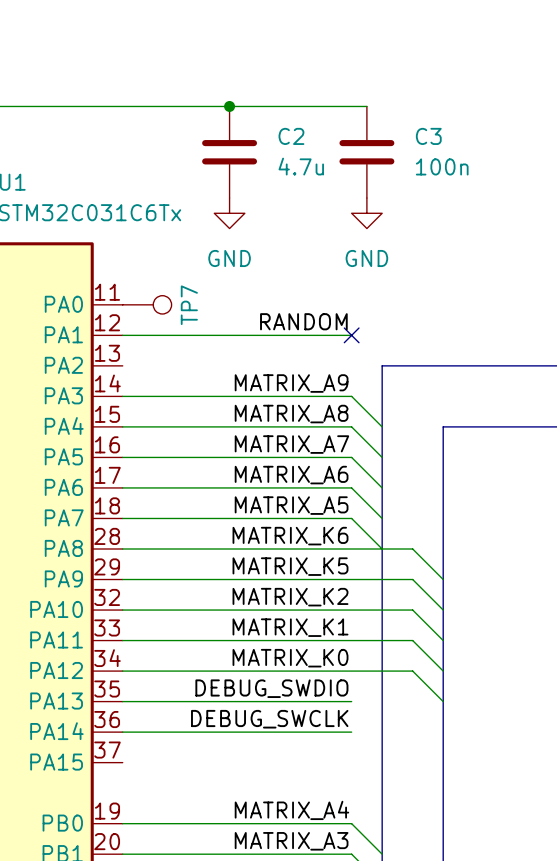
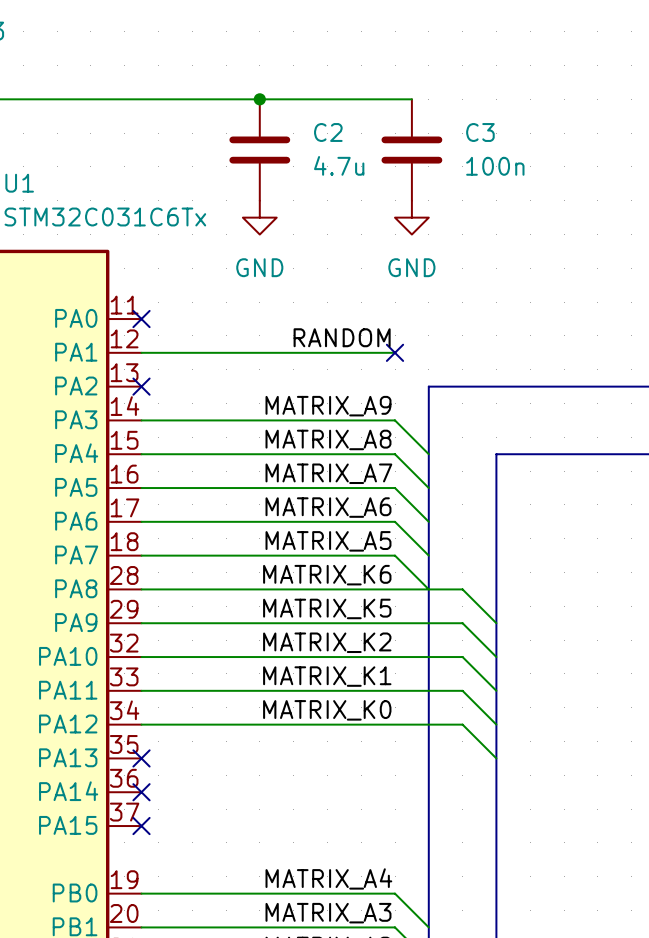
no-connect mark: none -> (141, 319)
TP7: (147, 304) -> none
no-connect mark: none -> (141, 386)
label: DEBUG_SWDIO (271, 688) -> none
wire: (122, 701) (351, 701) -> none
no-connect mark: none -> (141, 758)
label: DEBUG_SWCLK (269, 719) -> none
wire: (122, 732) (351, 732) -> none
no-connect mark: none -> (141, 792)
no-connect mark: none -> (141, 826)

